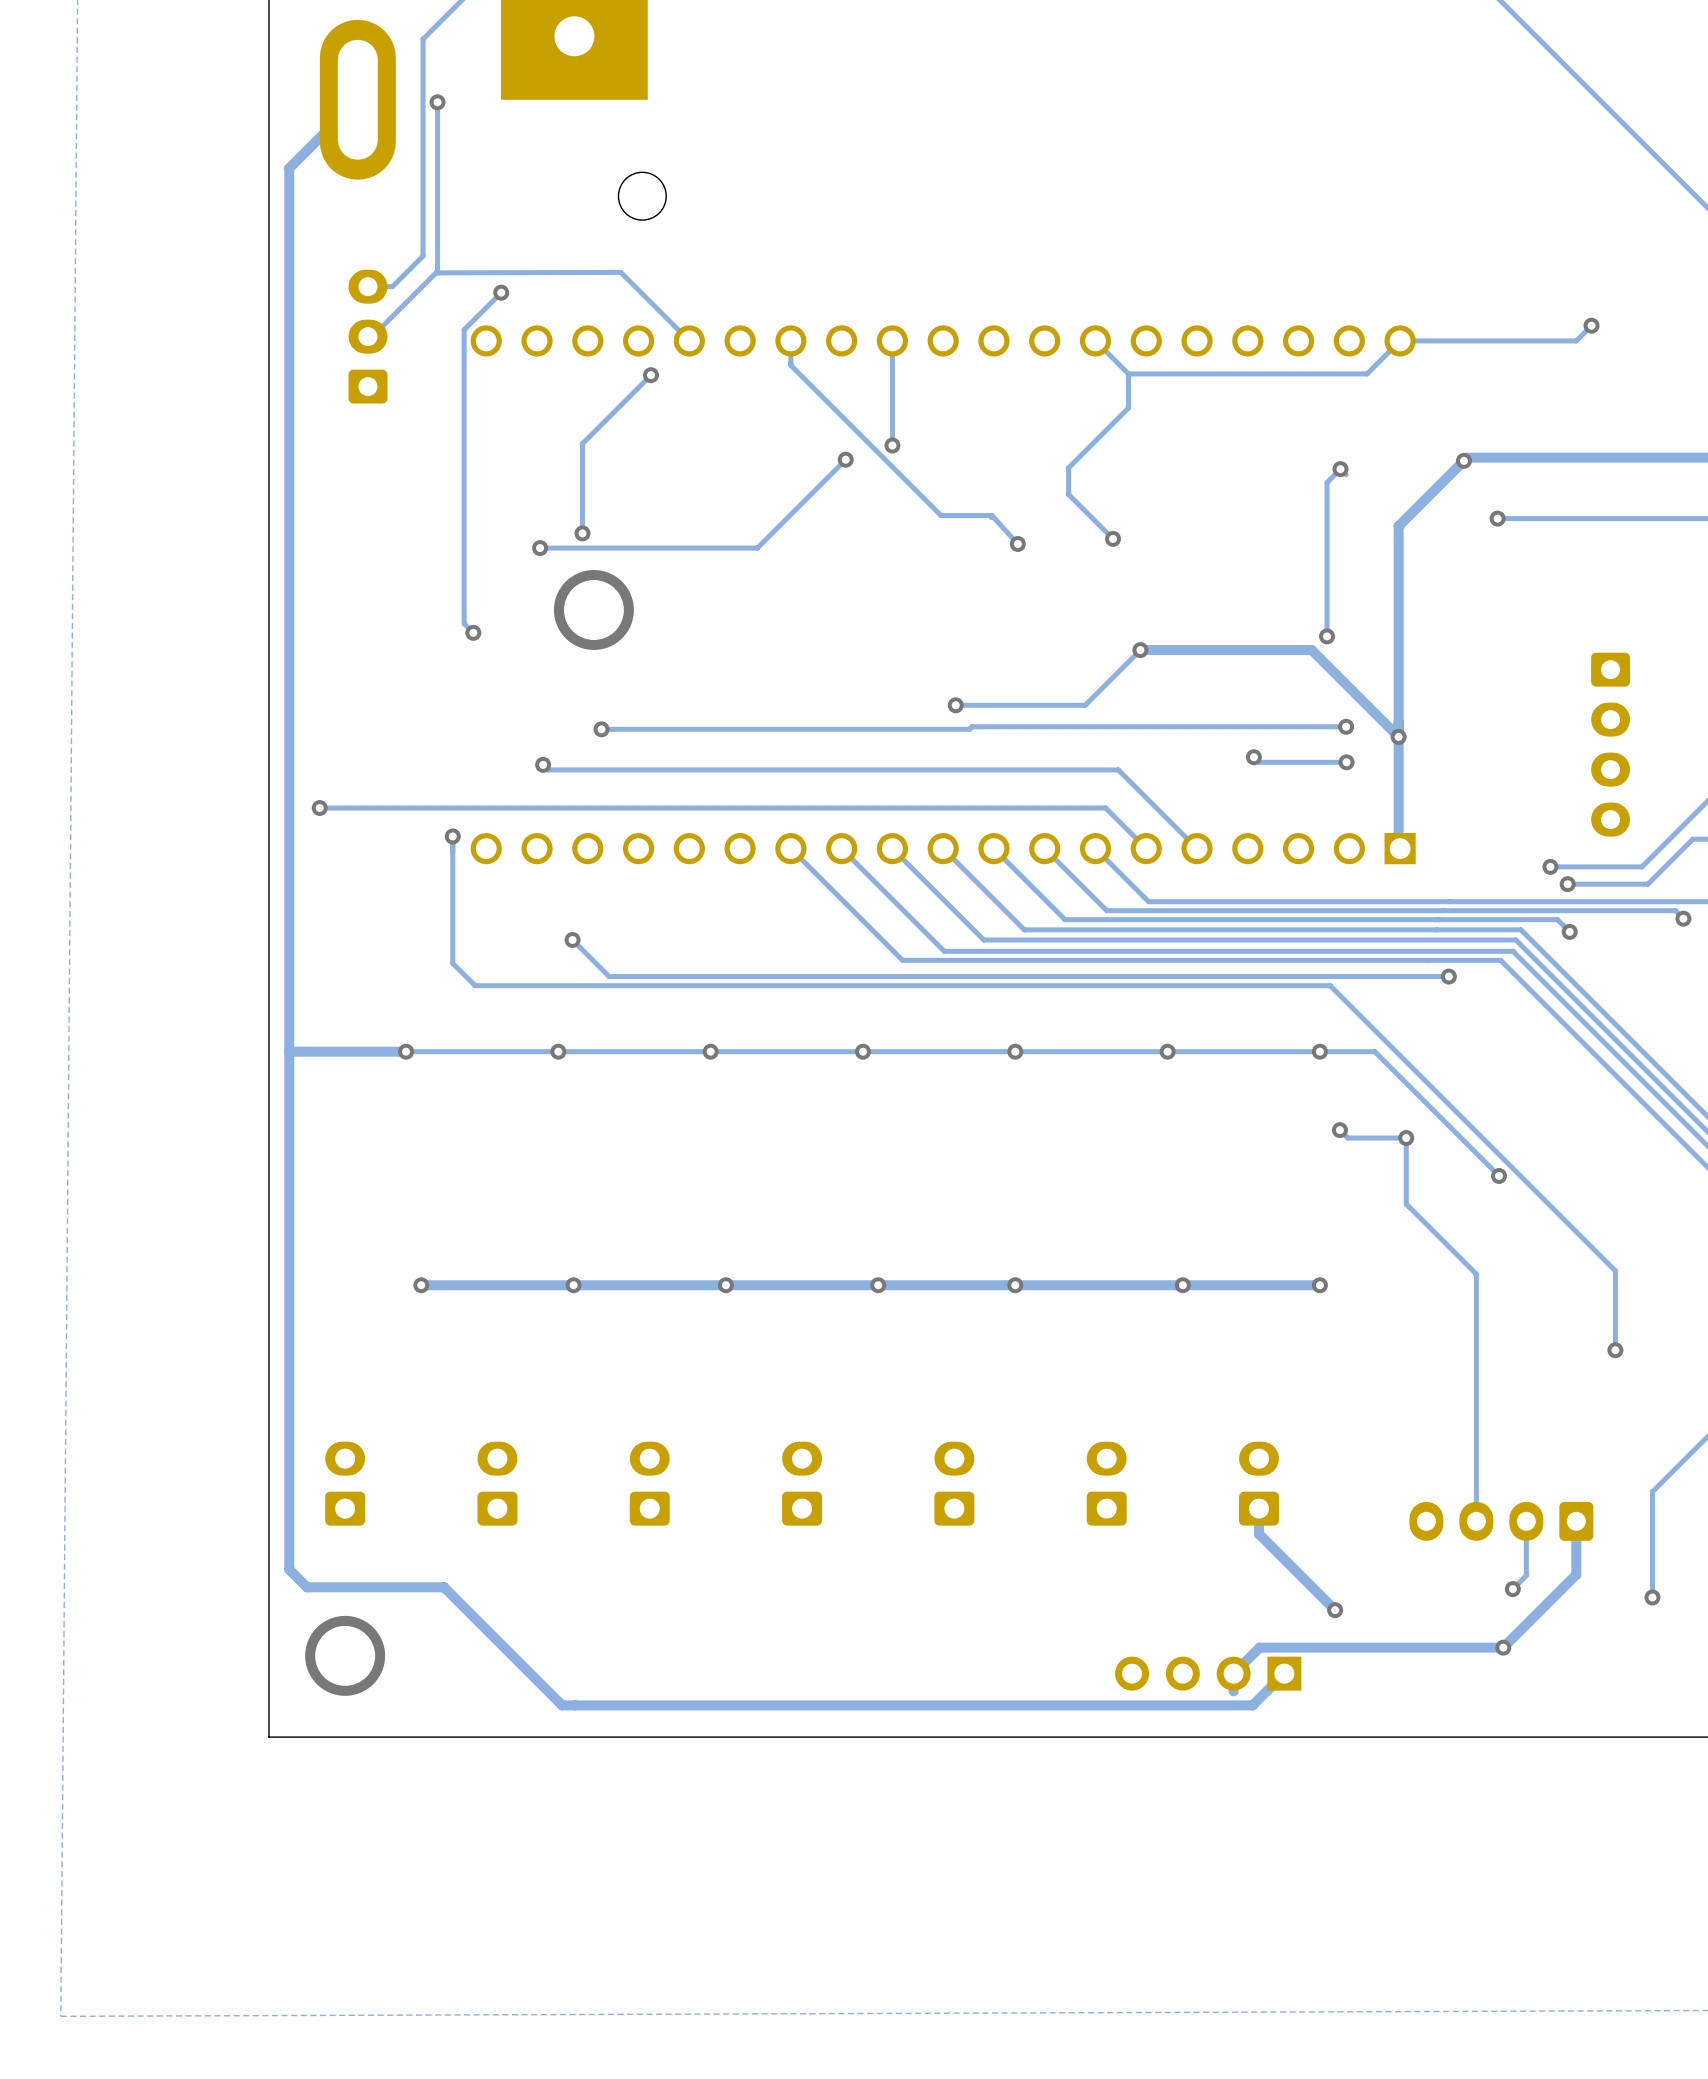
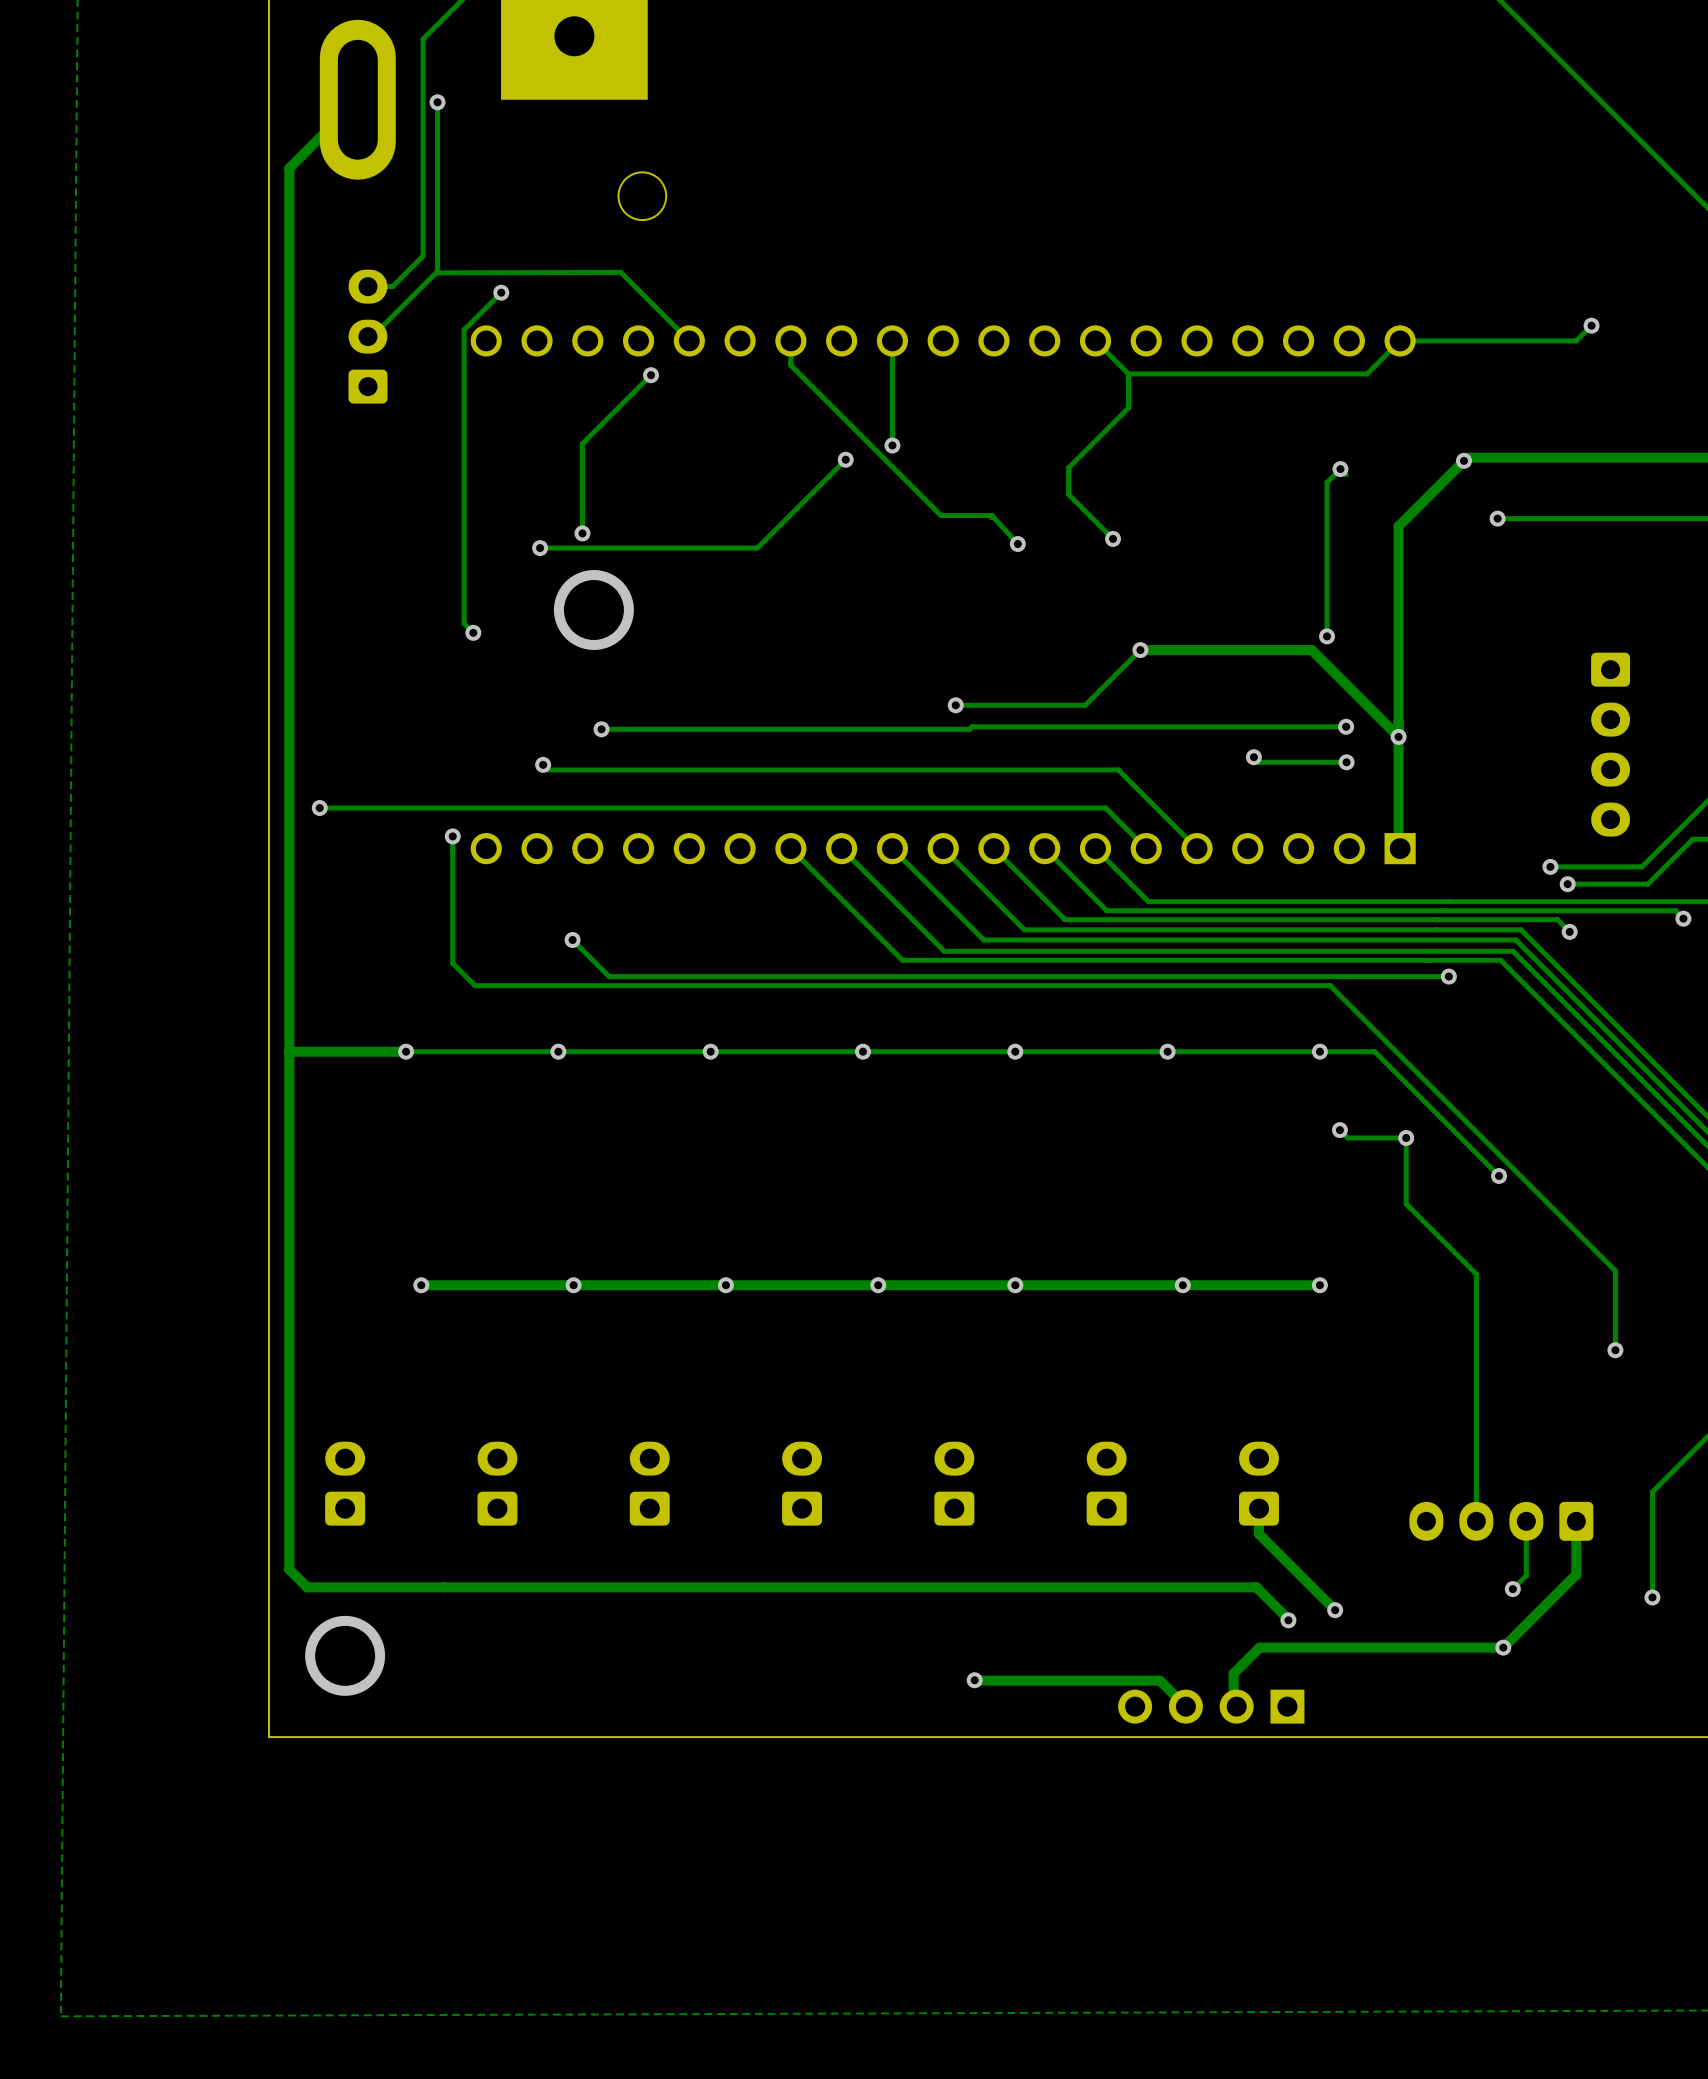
track: (444, 1587) (562, 1705) (1252, 1705) (1284, 1673) -> (444, 1587) (1256, 1587) (1288, 1620)
via: none -> (1288, 1620)
part position: (1208, 1673) -> (1211, 1706)
track: none -> (972, 1680) (1159, 1680) (1185, 1706)
via: none -> (974, 1680)

